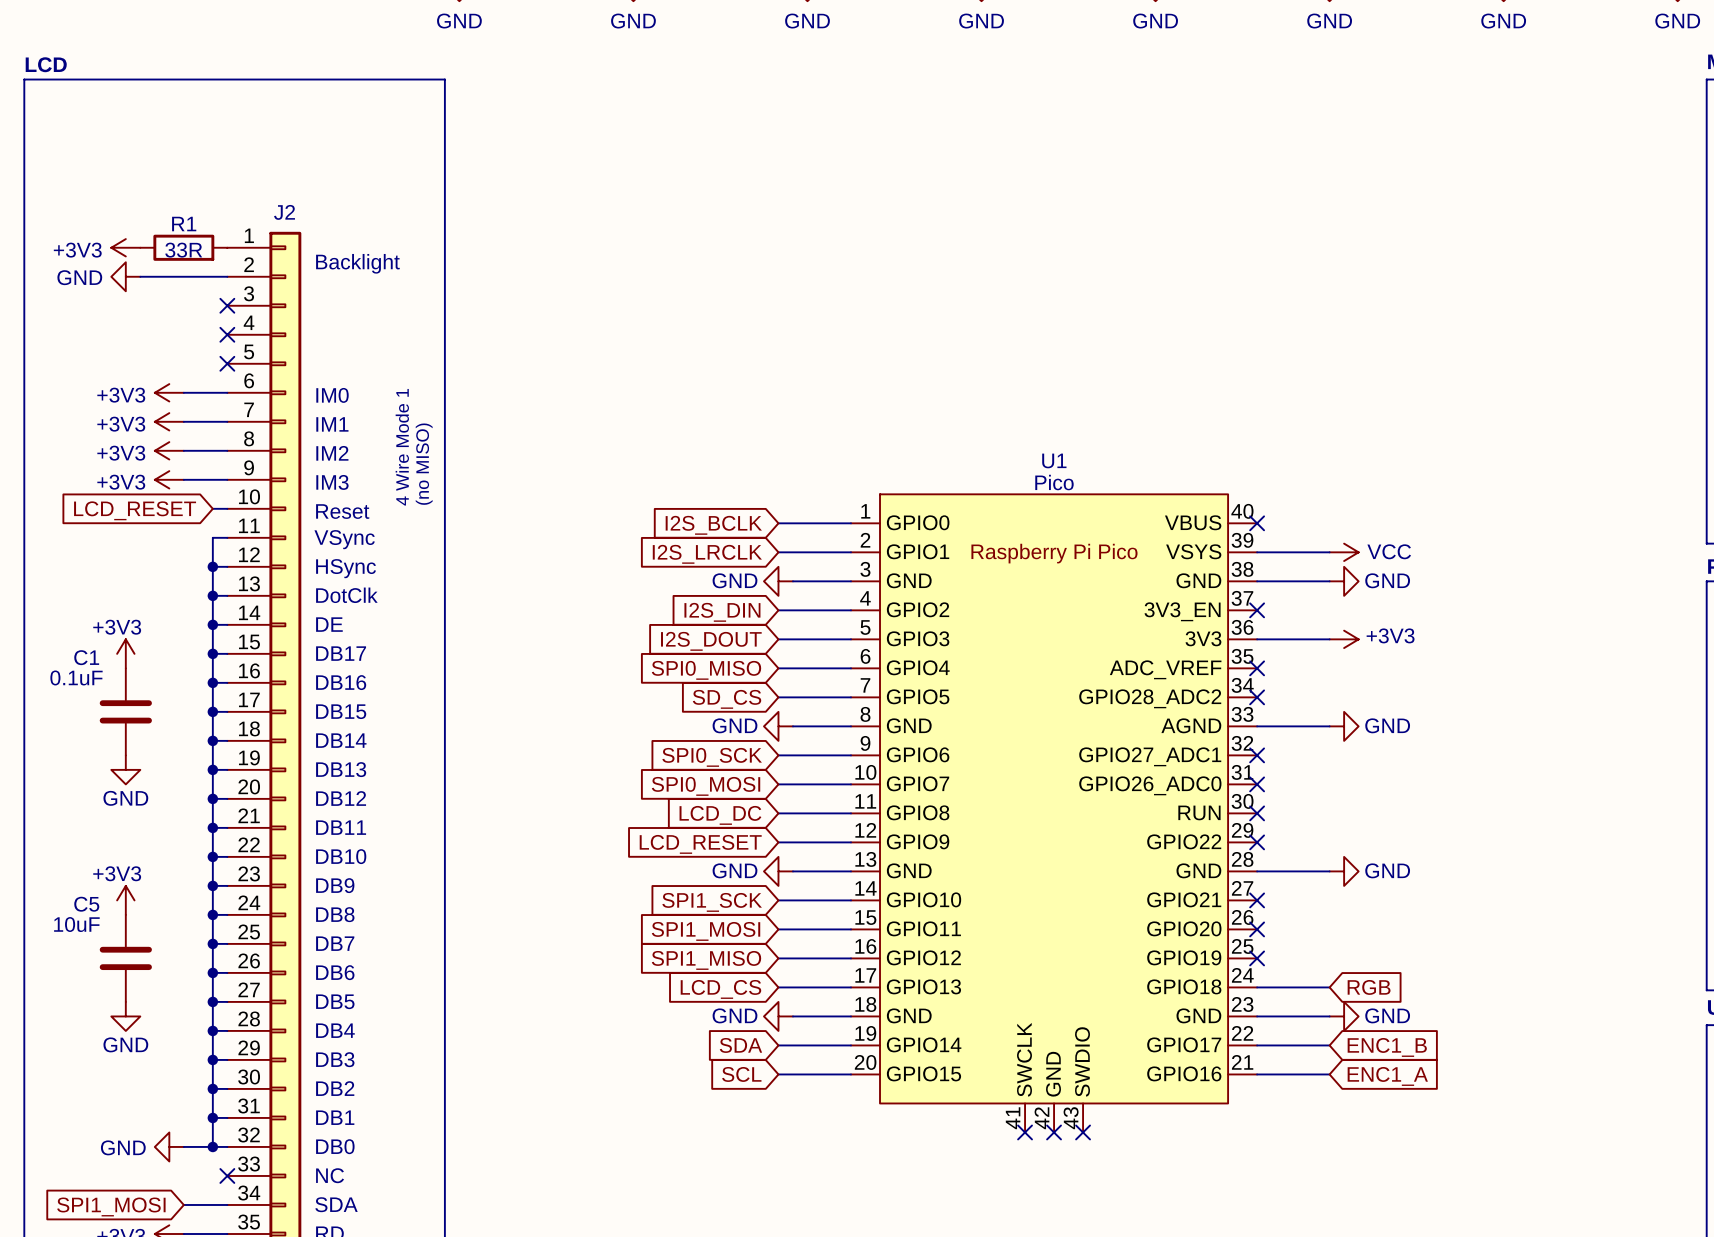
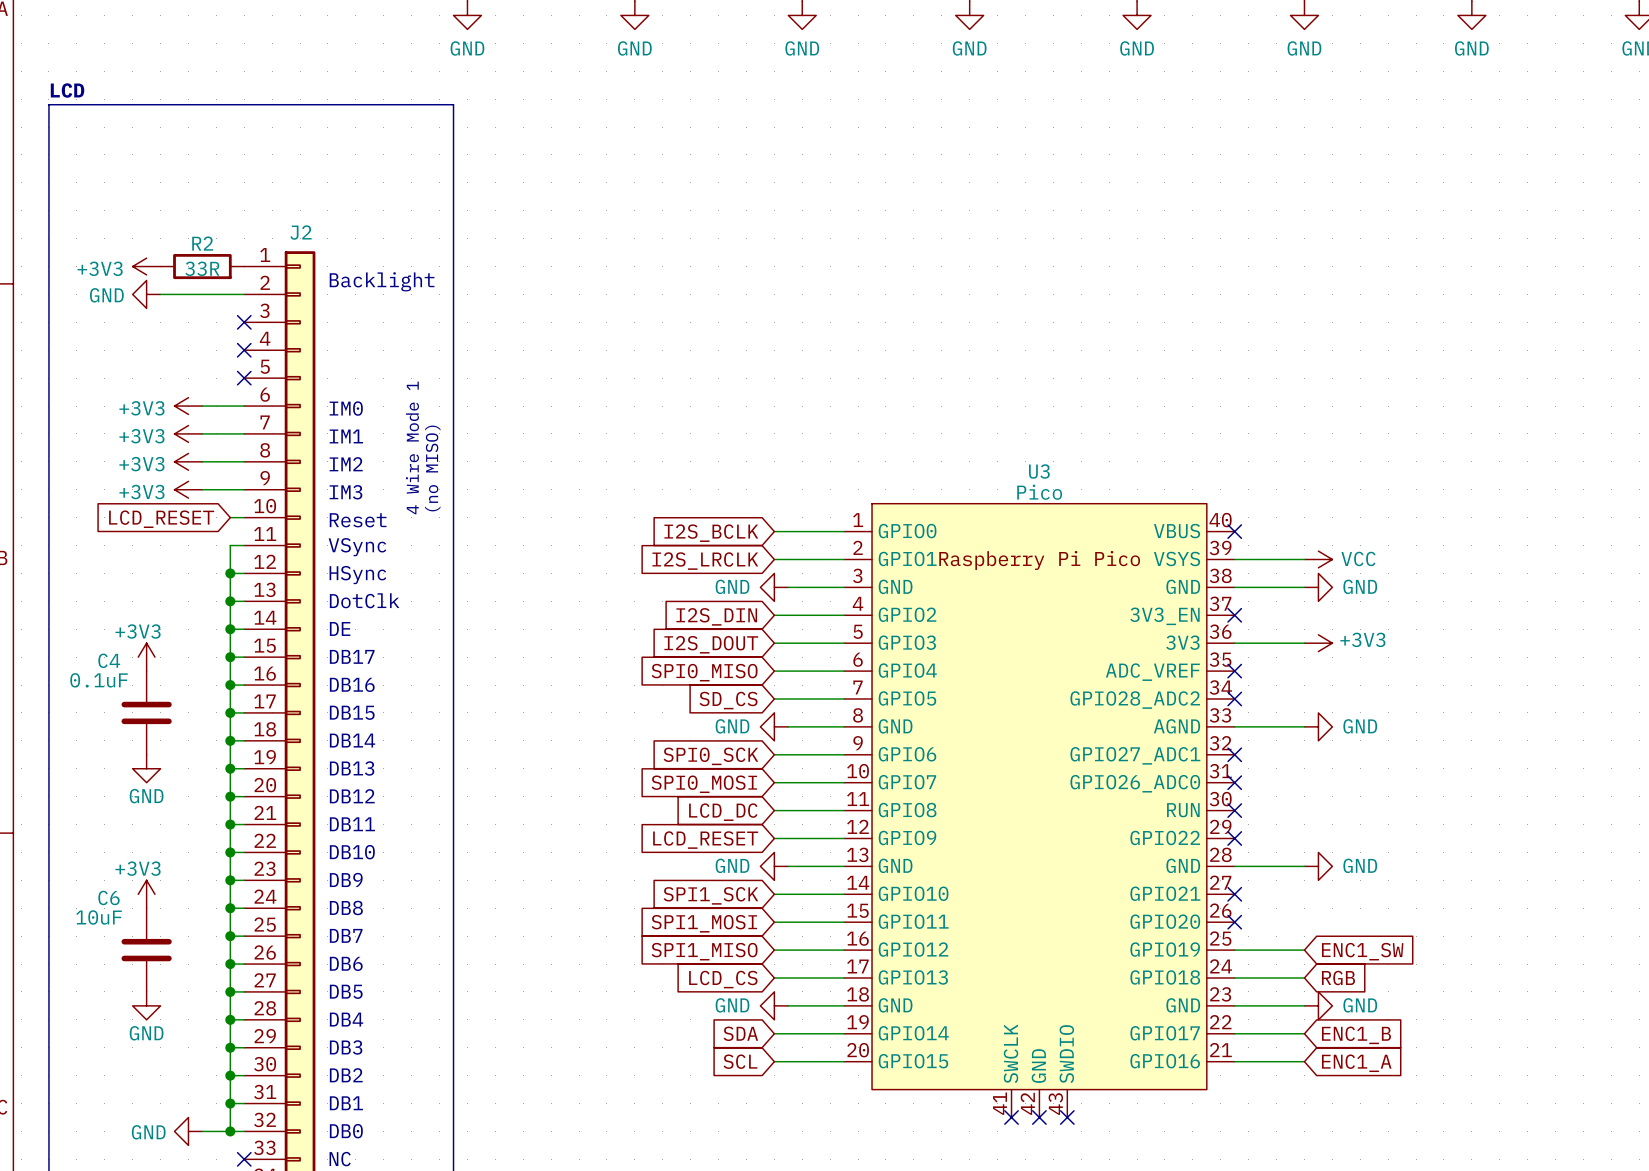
R1 name: R1 (184, 224) -> R2 (202, 243)
U1 name: U1 (1054, 460) -> U3 (1039, 471)
C1 name: C1 (86, 657) -> C4 (109, 660)
C5 name: C5 (86, 904) -> C6 (109, 897)
wire: none -> (1234, 950) (1304, 950)
no-connect mark: (1257, 958) -> none
global label: none -> ENC1_SW (1362, 951)

